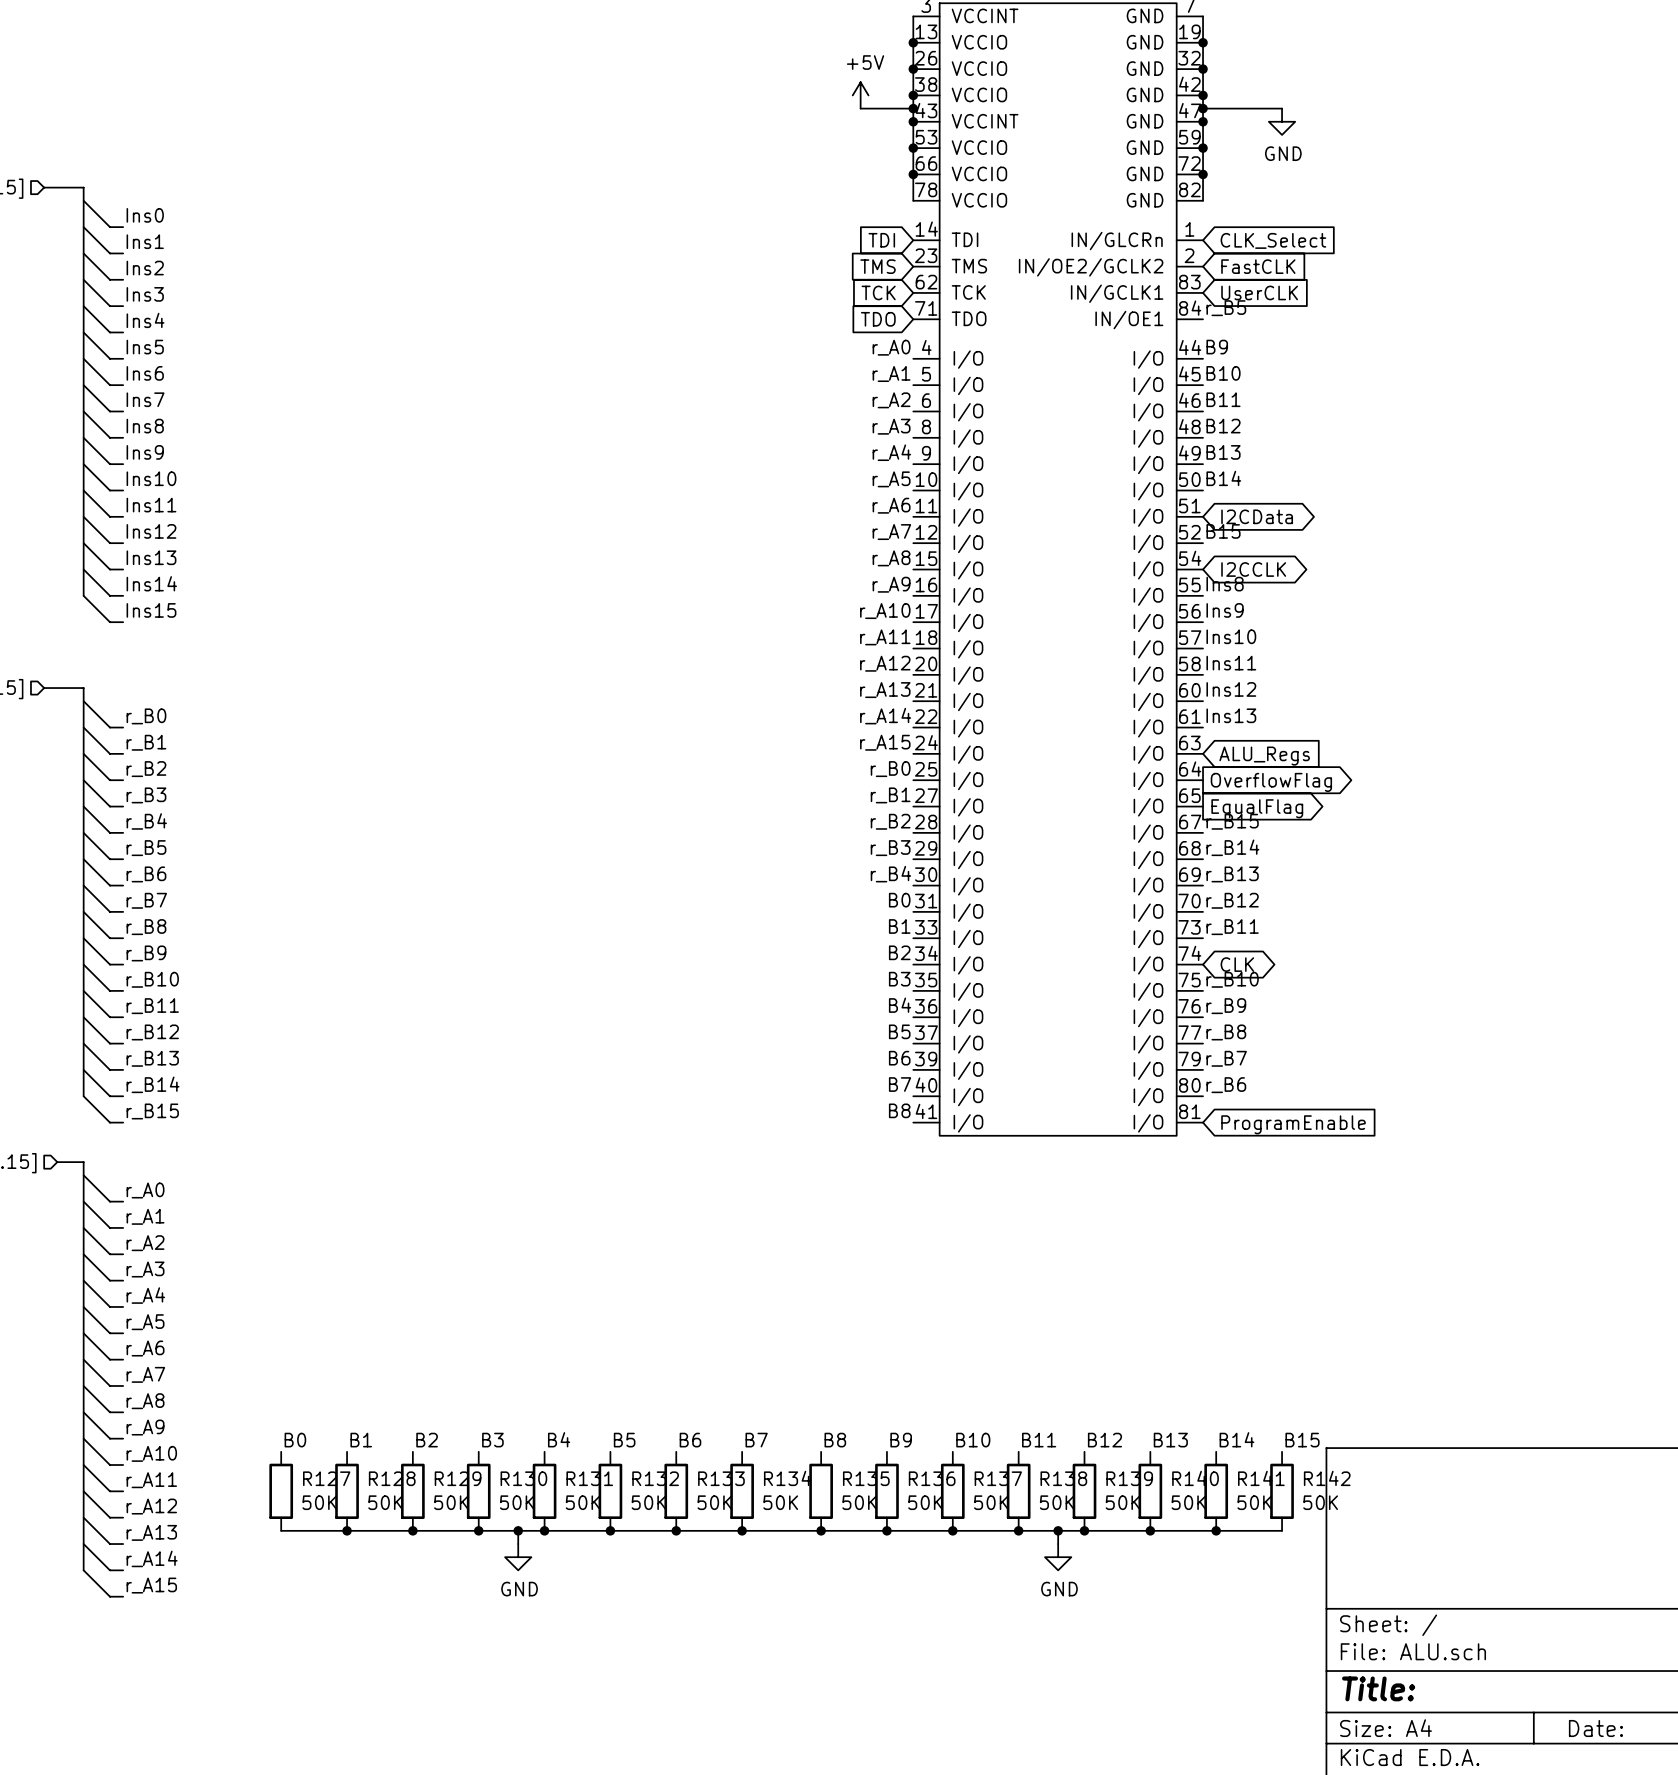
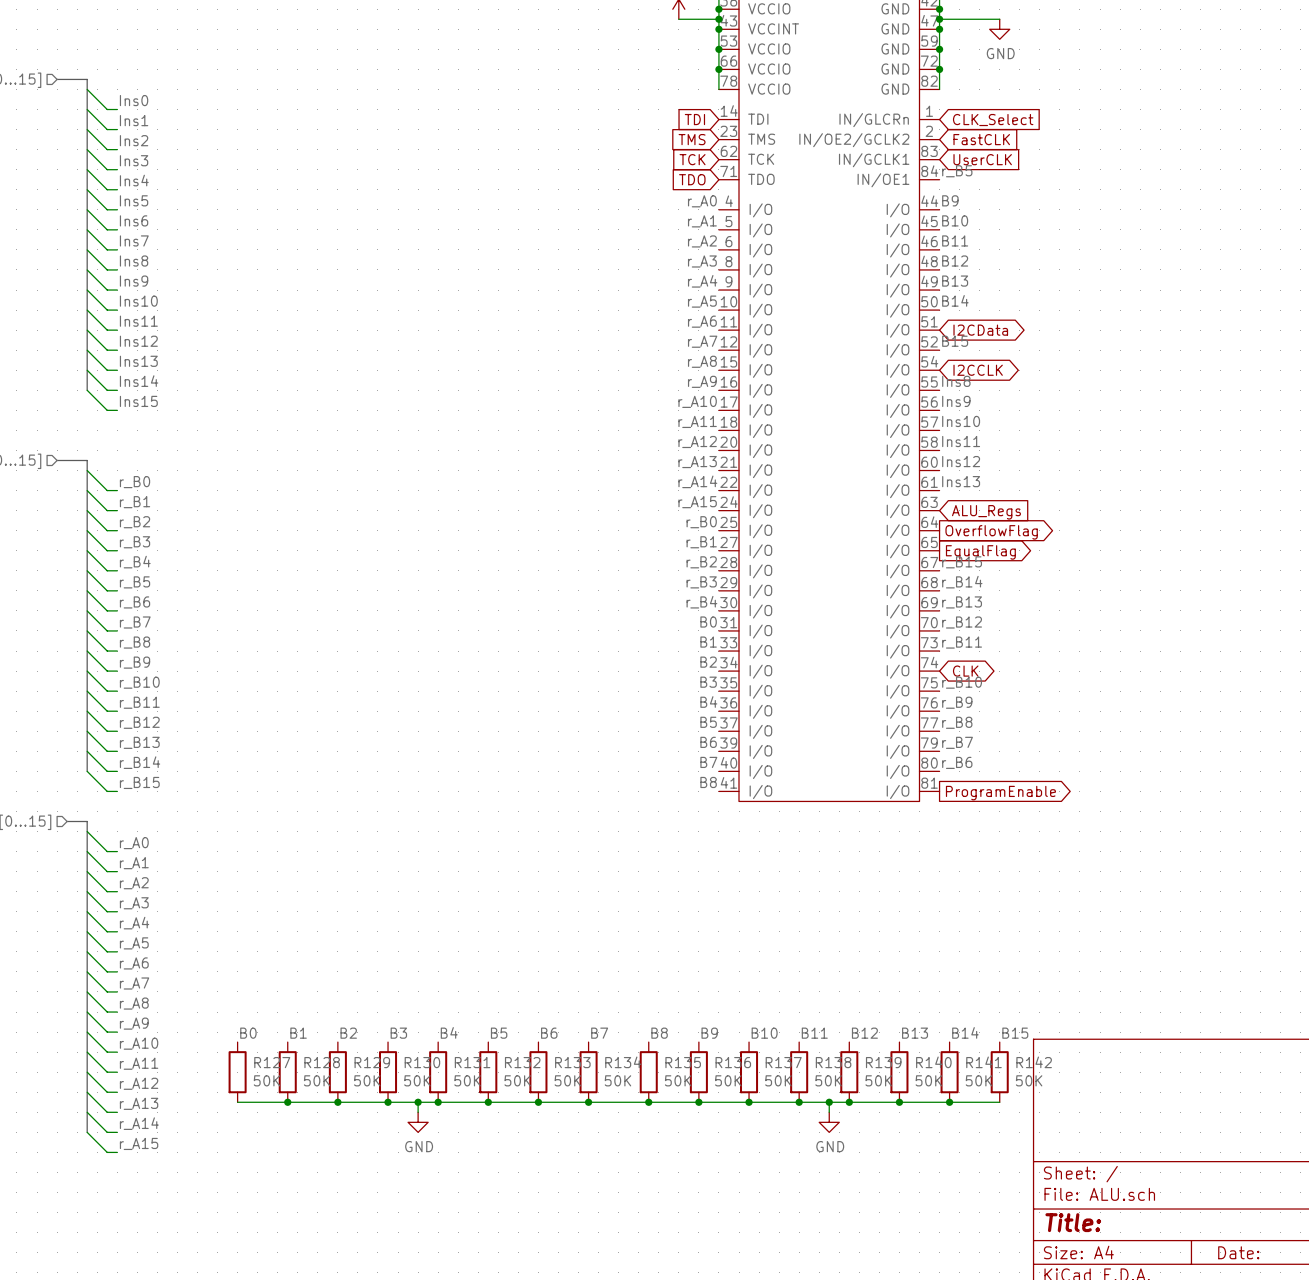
global label shape: input (1293, 1124) -> output (1000, 793)

